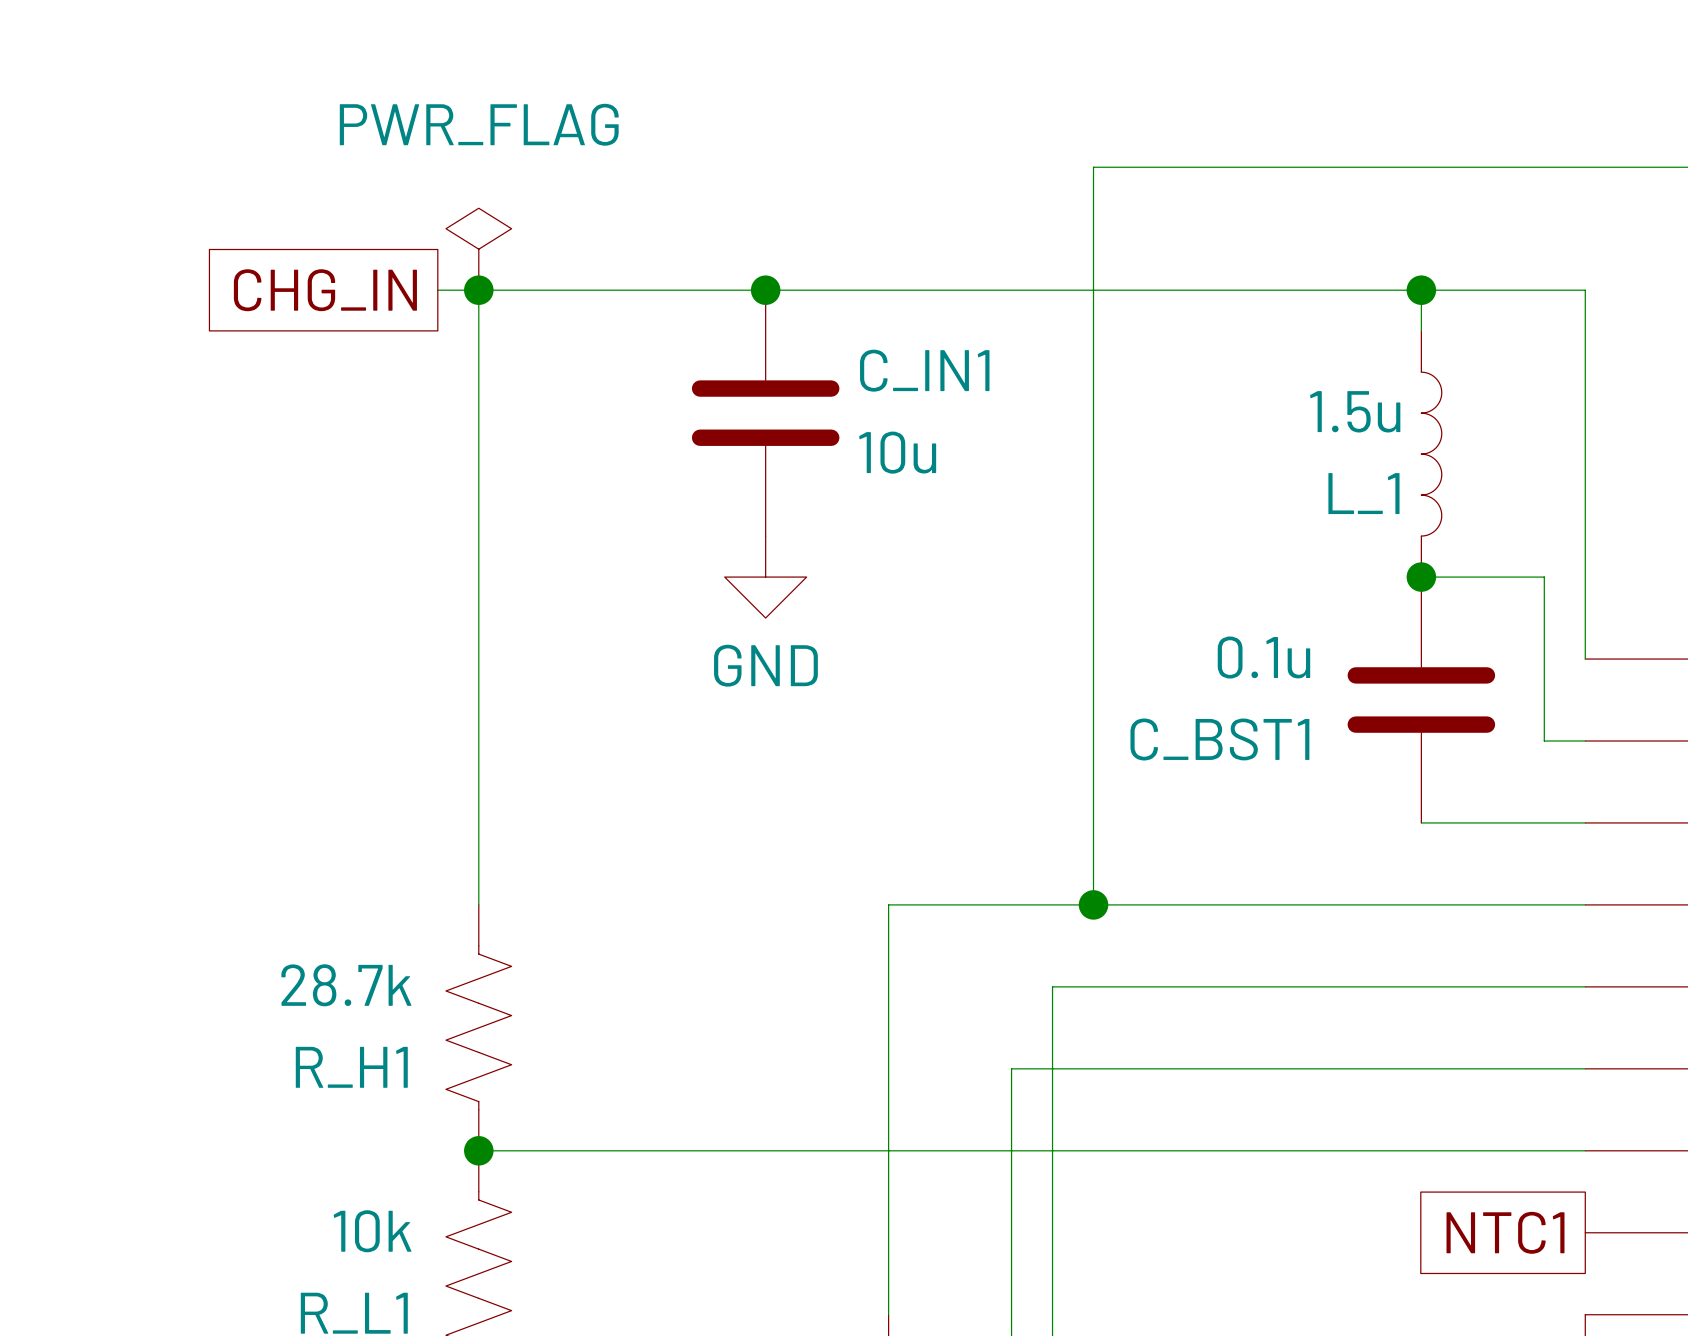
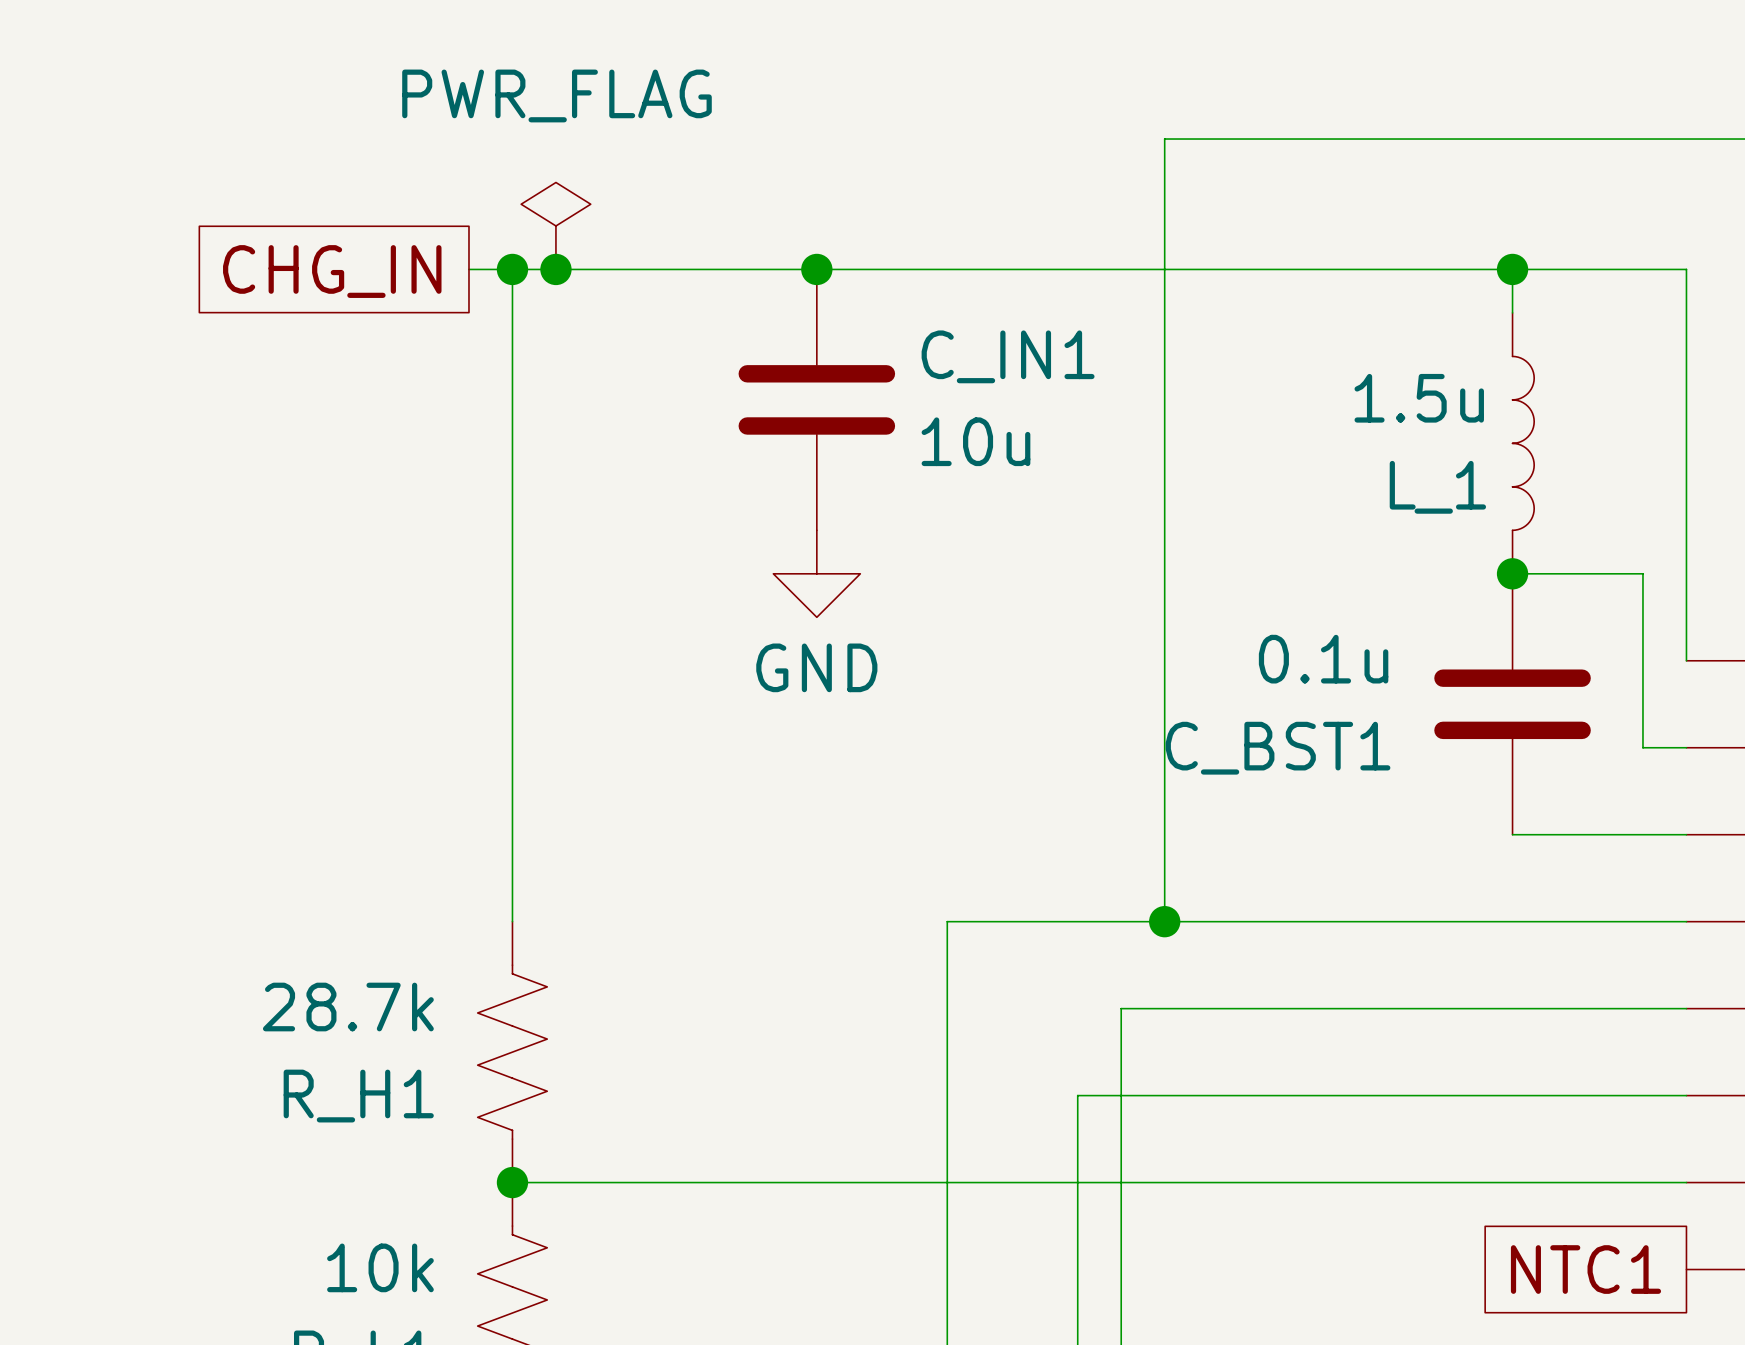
power symbol position: PWR_FLAG (478, 249) -> PWR_FLAG (555, 225)
junction: none -> (555, 269)

